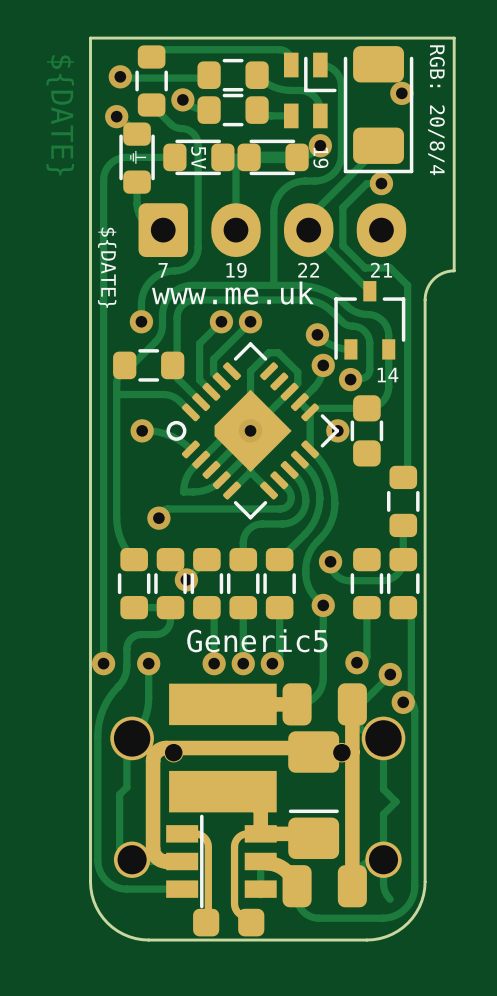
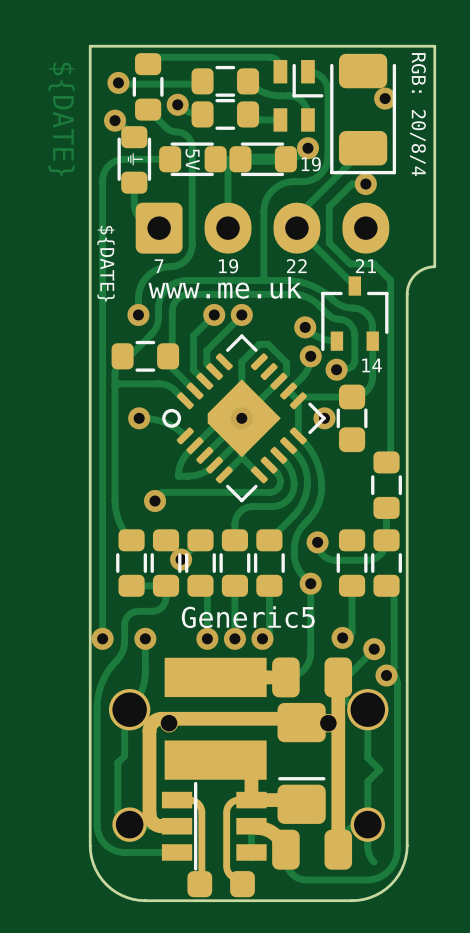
text rotation: 0° (320, 157) -> 90° counterclockwise (311, 164)

